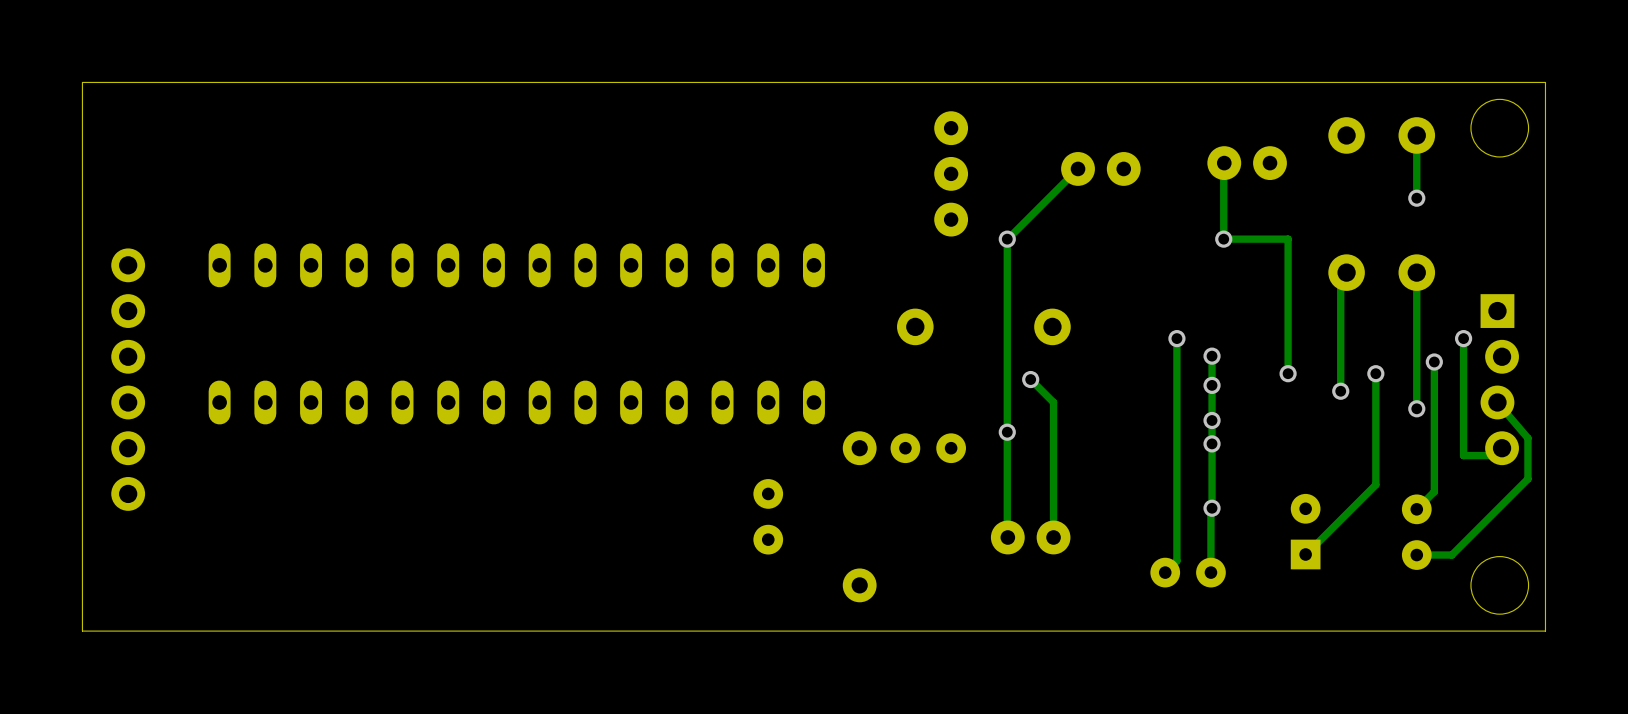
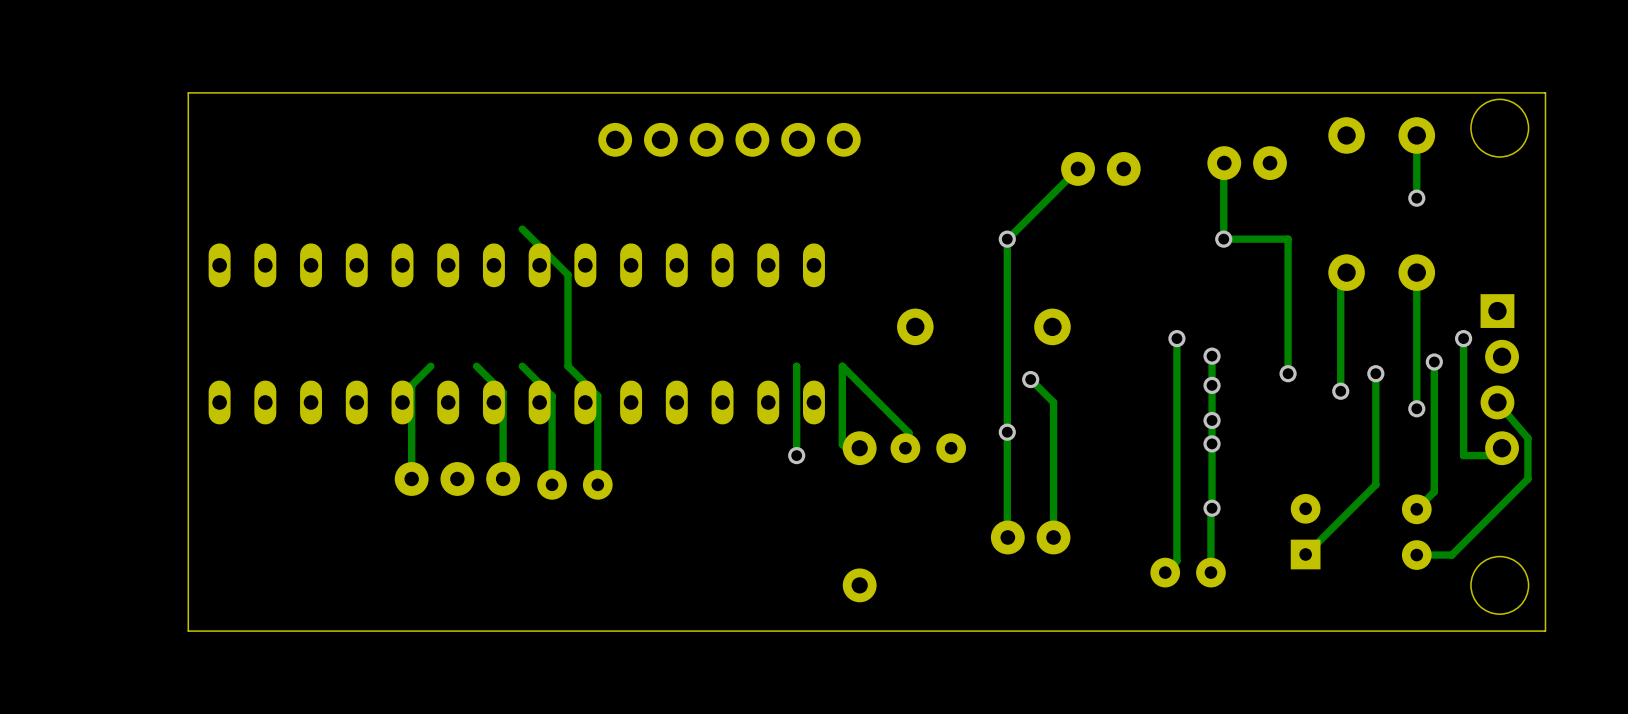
board edge: (1545, 92) (1545, 82) (82, 82) (82, 631) (188, 631) -> (1545, 92) (188, 92) (188, 631)
part: none -> (729, 139)
part: (951, 173) -> none
track: none -> (522, 229) (568, 274) (568, 366) (597, 396) (597, 484)
track: none -> (430, 366) (411, 385) (411, 478)
track: none -> (476, 366) (503, 392) (503, 478)
track: none -> (522, 366) (552, 396) (552, 484)
track: none -> (796, 366) (796, 455)
part: (128, 379) -> none
via: none -> (796, 455)
track: none -> (908, 455) (908, 432) (842, 366) (842, 444) (855, 457)
part: none -> (457, 478)
part rotation: 0° (768, 516) -> 90° clockwise (574, 484)
part position: (768, 516) -> (574, 484)

